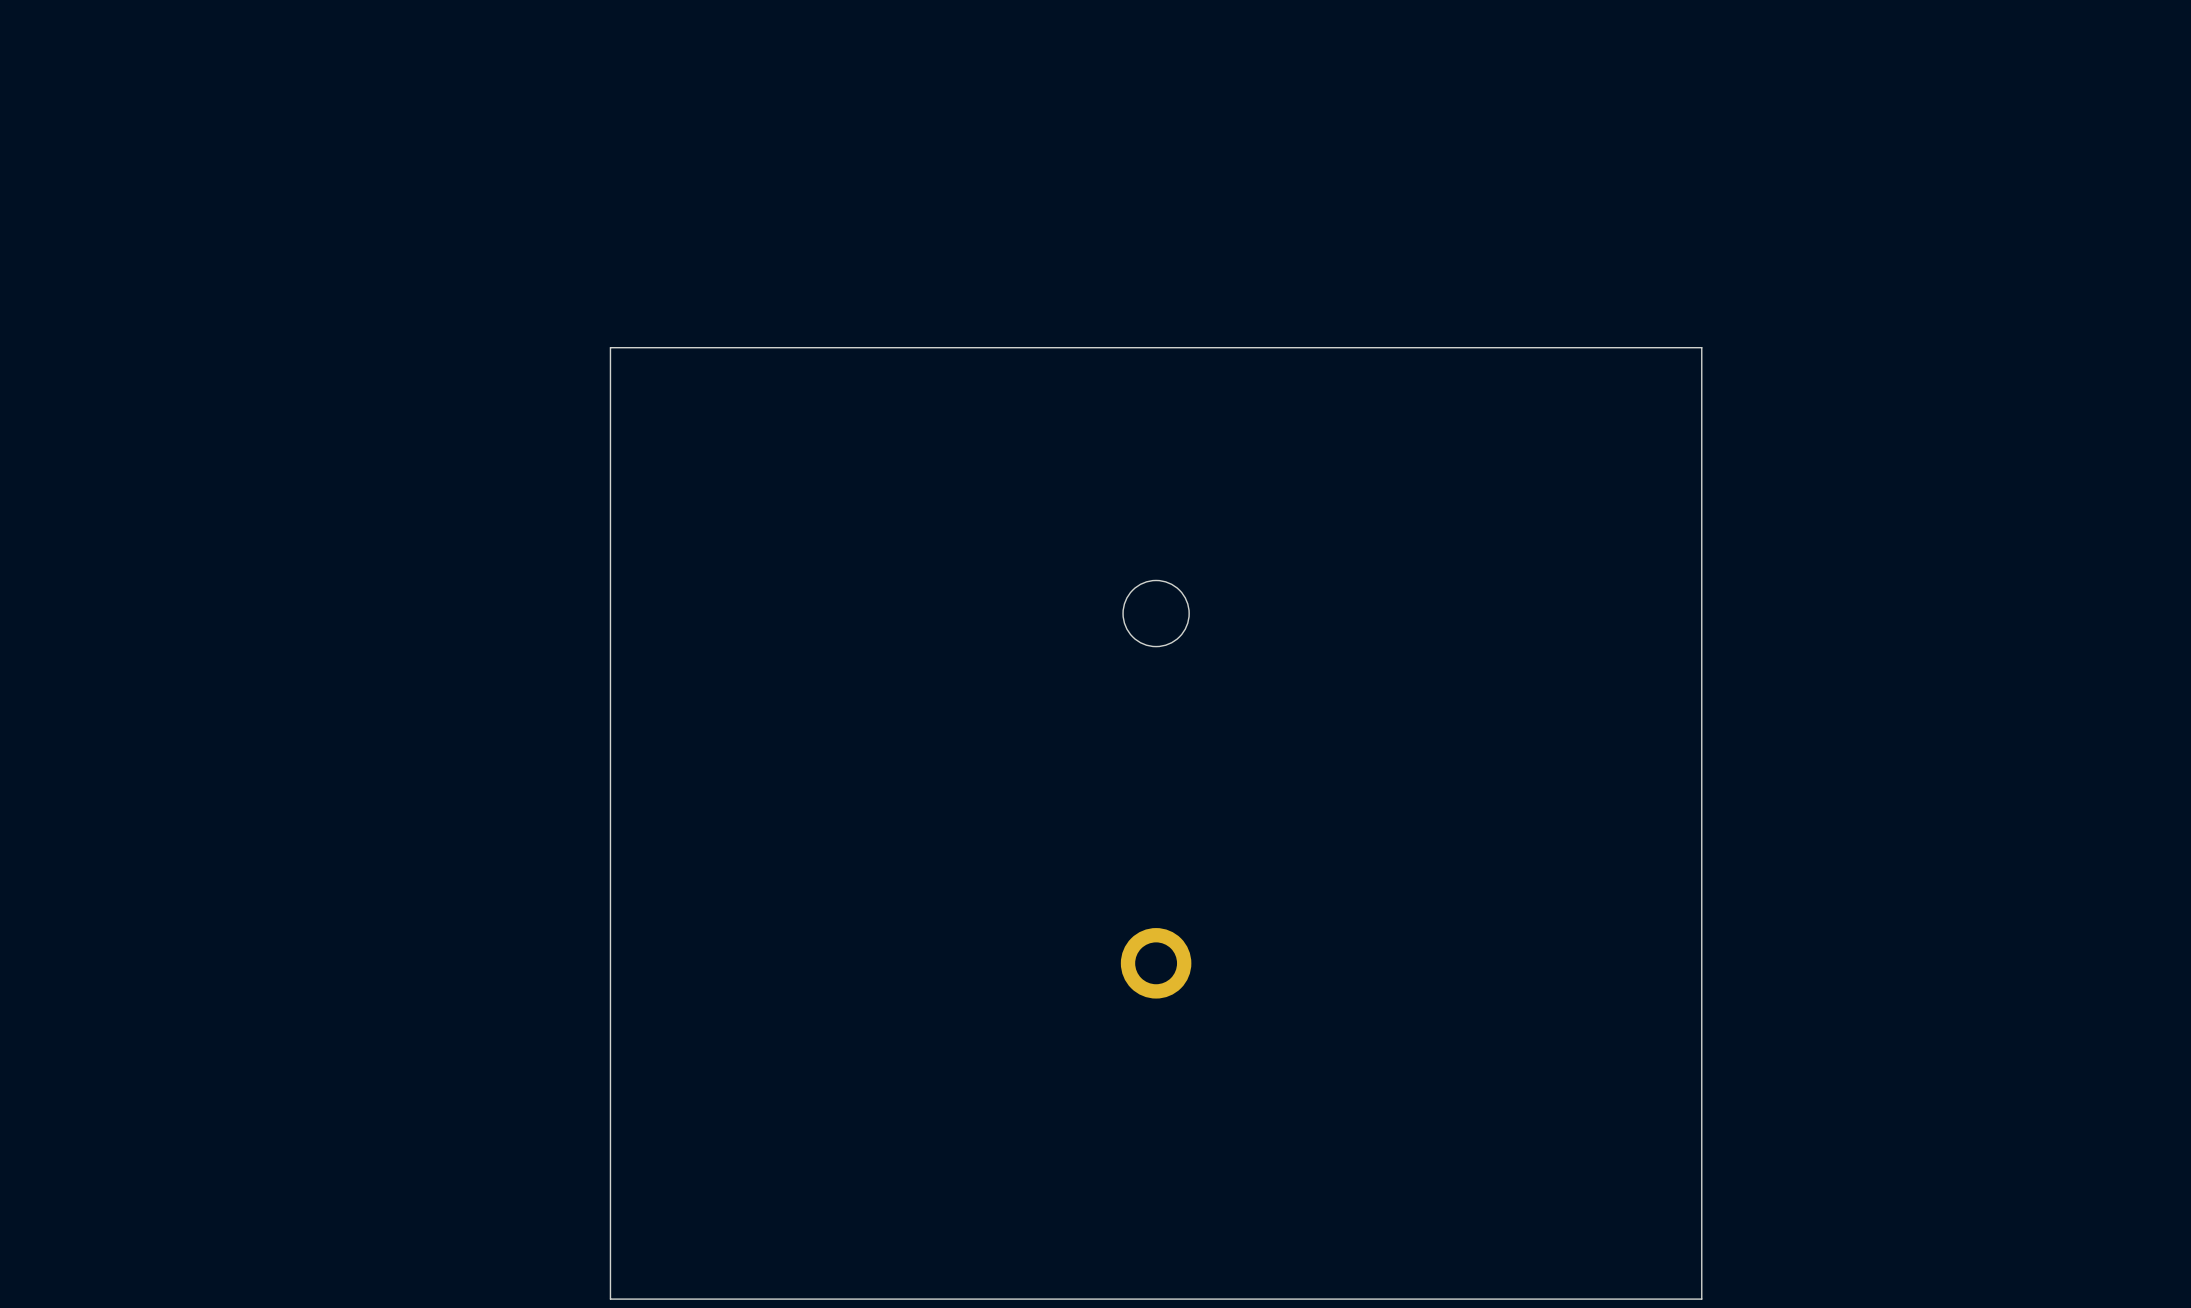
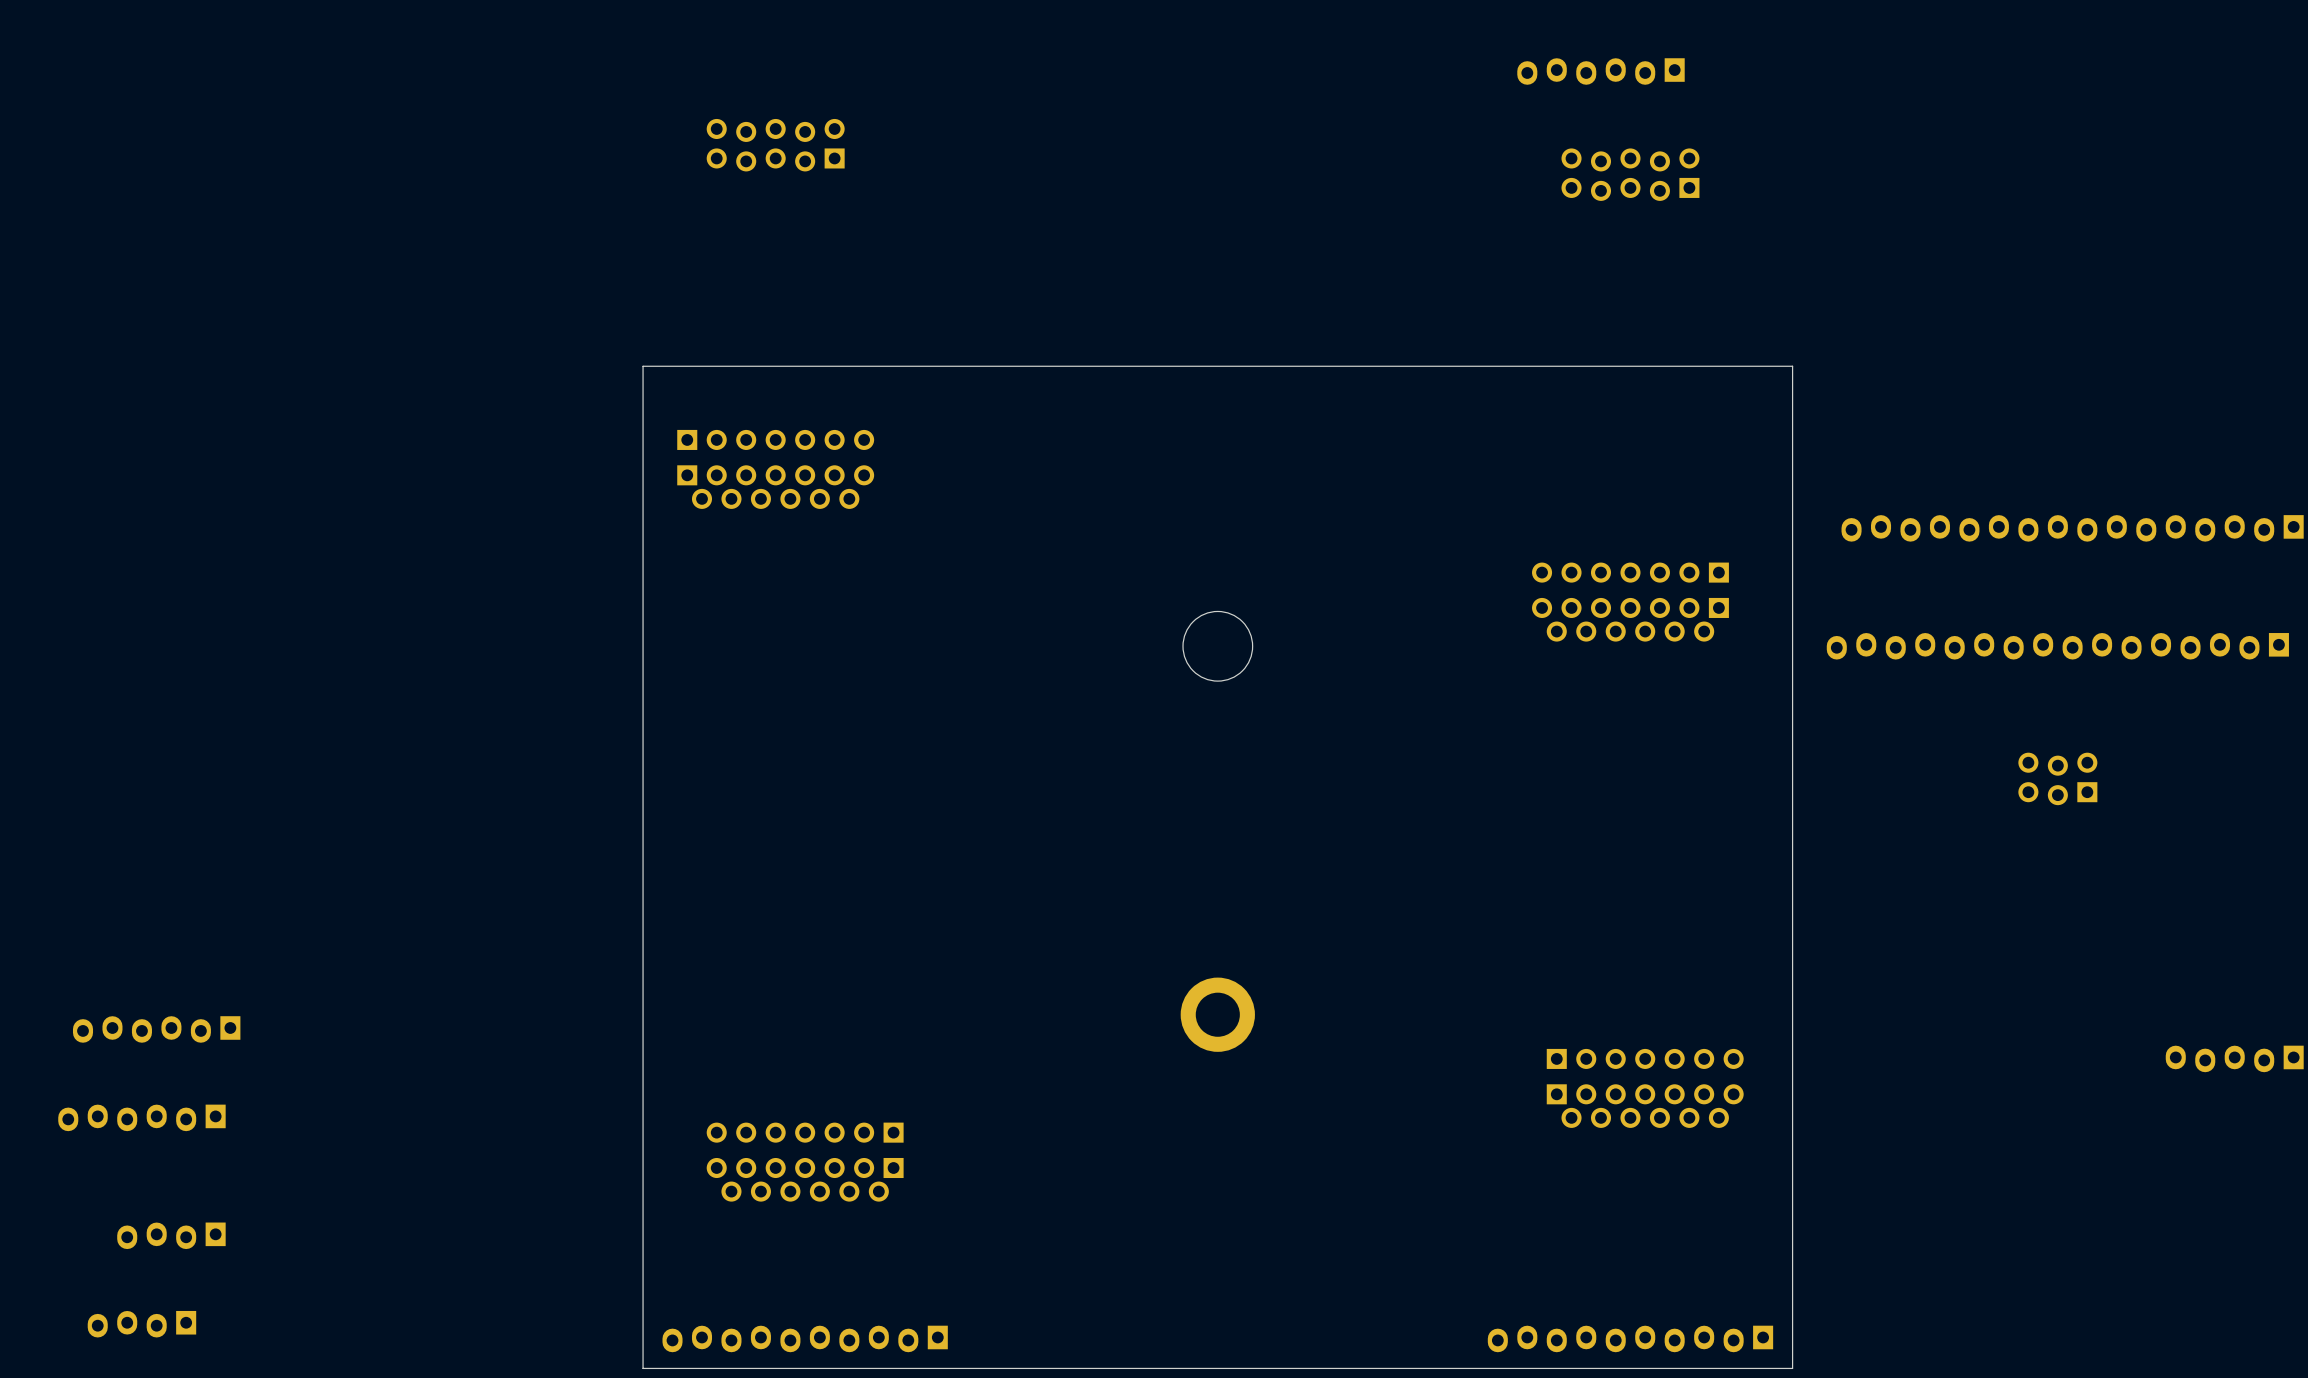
part: none -> (1601, 71)
part: none -> (775, 145)
part: none -> (1630, 174)
part: none -> (775, 469)
part: none -> (2072, 528)
part: none -> (1630, 602)
part: none -> (2057, 646)
part: none -> (2057, 778)
part: none -> (156, 1029)
part: none -> (2234, 1058)
part: none -> (1645, 1088)
part: none -> (141, 1117)
part: none -> (805, 1162)
part: none -> (171, 1235)
part: none -> (141, 1324)
part: none -> (805, 1338)
part: none -> (1630, 1338)

